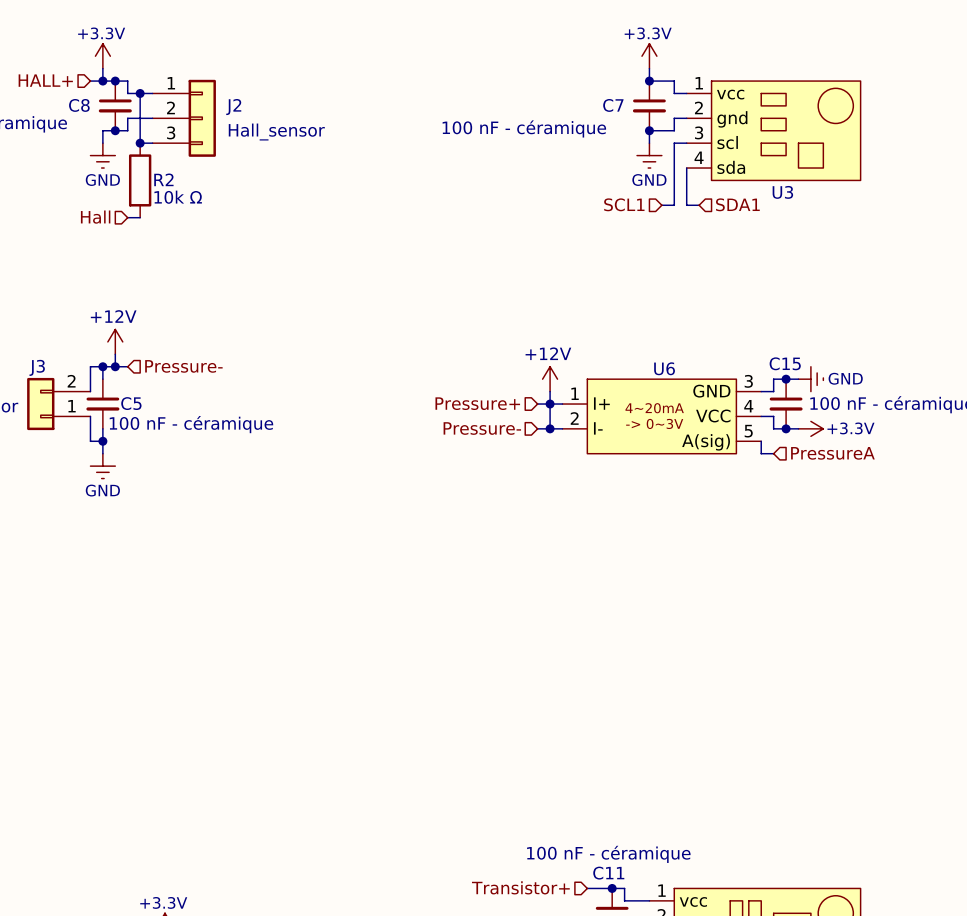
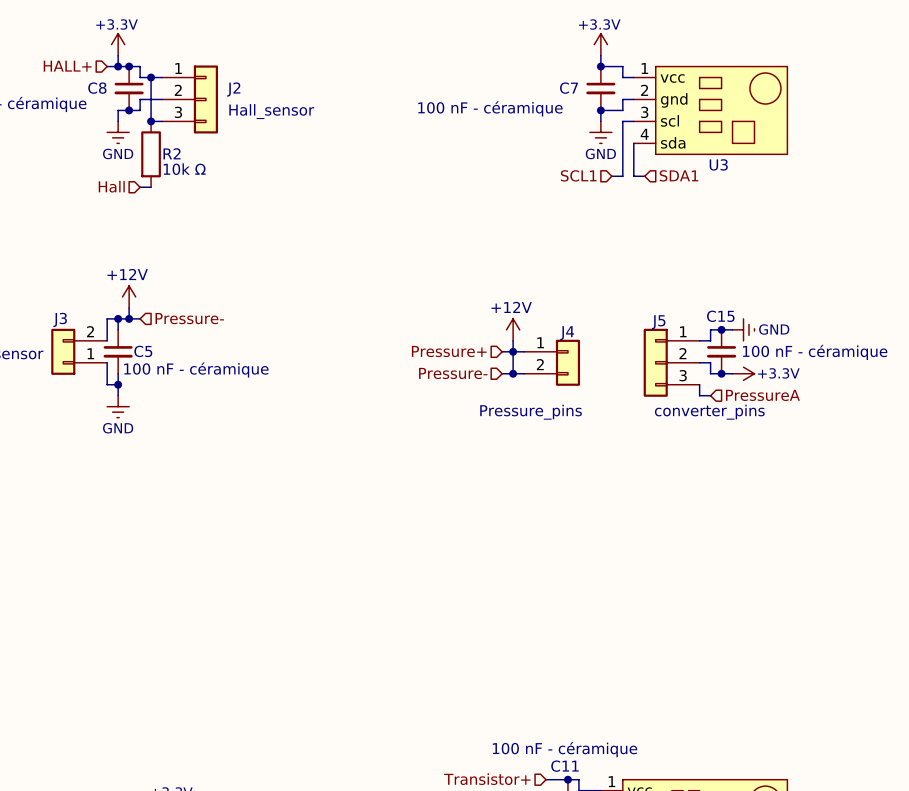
J4: none -> Pressure_pins (552, 362)
U6: (661, 416) -> none
J5: none -> converter_pins (671, 362)

